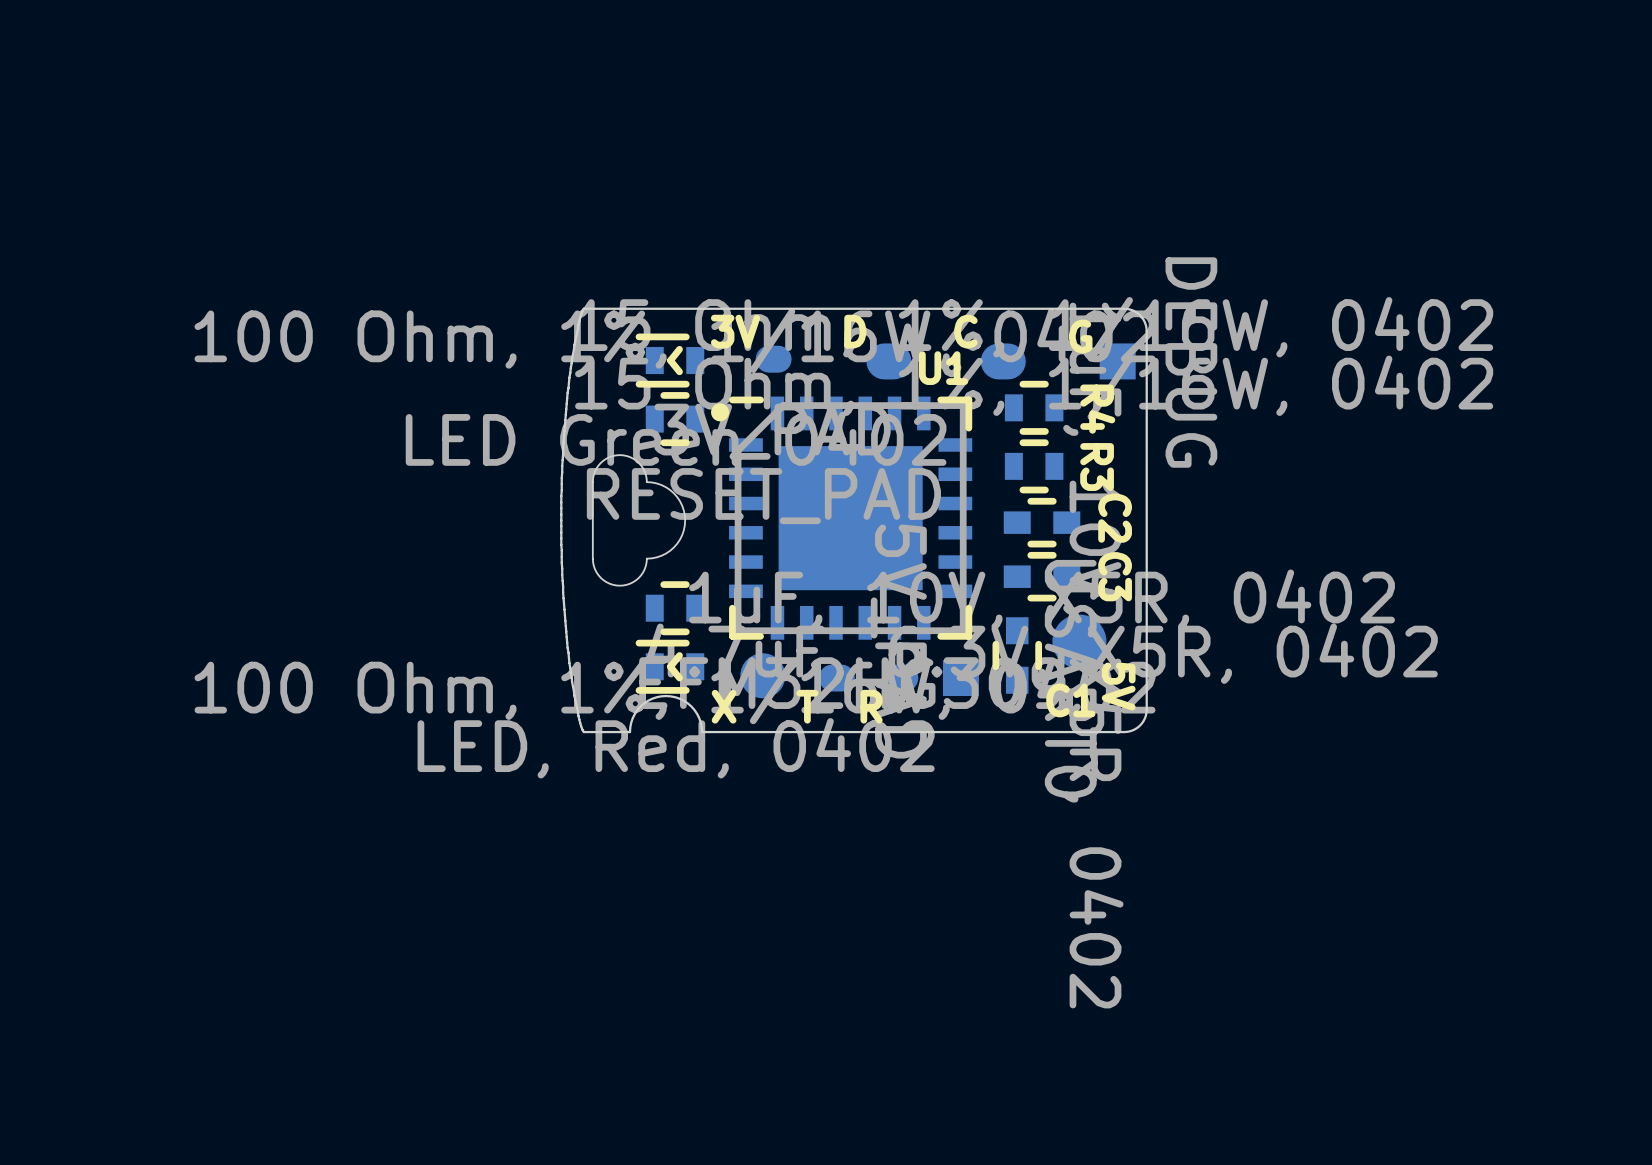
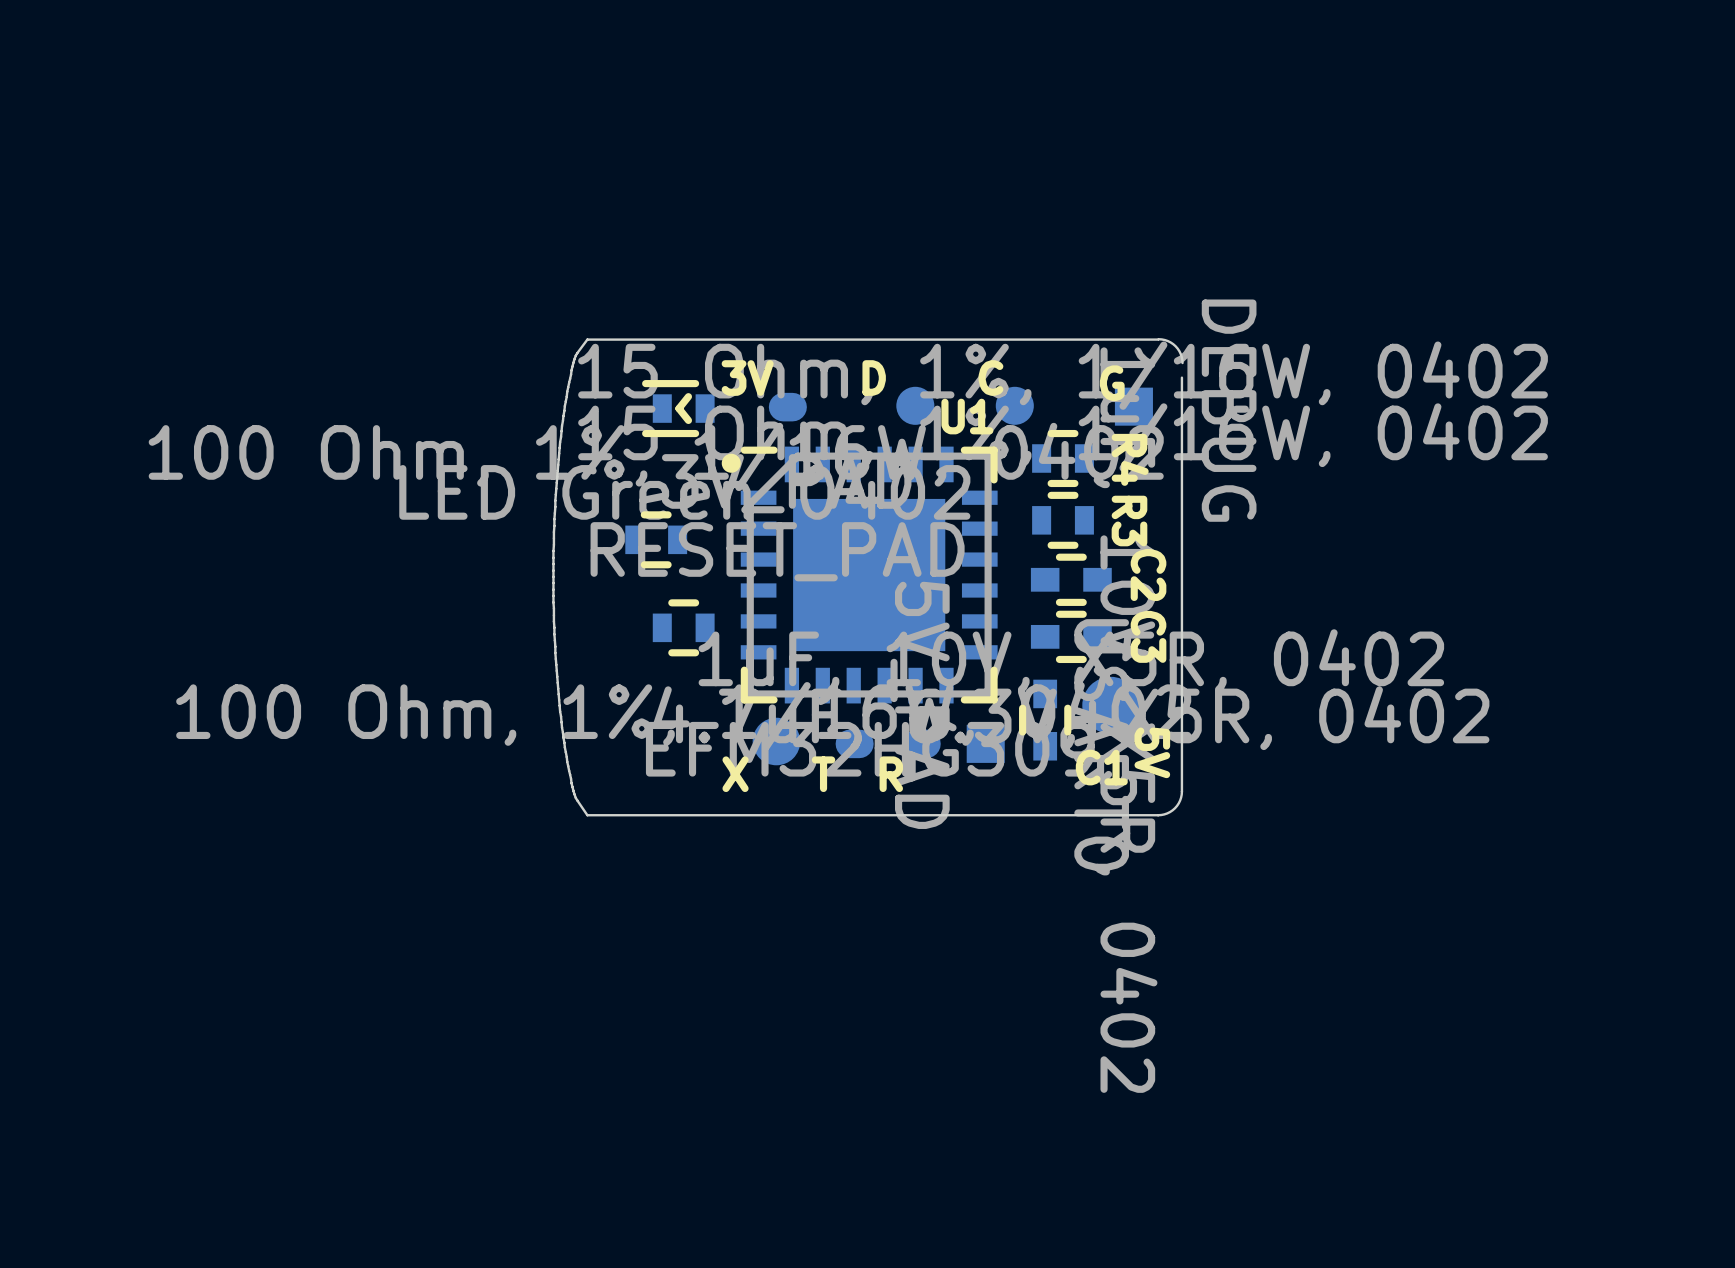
board edge: none -> (1158, 339) (1167, 341) (1175, 346) (1180, 353) (1182, 363)
board edge: (1146, 331) (1145, 322) (1140, 315) (1132, 310) (1124, 308) (583, 308) (578, 324) (569, 377) (561, 496) (562, 574) (567, 647) (574, 695) (583, 732) (629, 732) (632, 718) (640, 706) (652, 698) (666, 696) (679, 698) (691, 706) (699, 718) (702, 732) (1124, 732) (1132, 730) (1140, 725) (1145, 718) (1146, 709) -> (1158, 339) (587, 339) (577, 353) (573, 362) (560, 442) (553, 551) (555, 652) (560, 711) (567, 761) (575, 797) (587, 815) (1158, 815) (1170, 812) (1178, 803) (1181, 794) (1181, 777)
part footprint: [866, 343, 1136, 380] -> [896, 386, 1153, 426]
part position: (675, 419) -> (656, 539)
board edge: (592, 482) (592, 558) -> none
board edge: (592, 482) (596, 468) (606, 458) (619, 455) (630, 457) (643, 468) (646, 482) (661, 485) (677, 497) (683, 510) (685, 520) (683, 530) (677, 543) (661, 555) (646, 558) (643, 572) (630, 583) (619, 585) (606, 582) (596, 572) (592, 558) -> none
part position: (675, 608) -> (683, 627)
part: LED, Red, 0402 (669, 666) -> none

